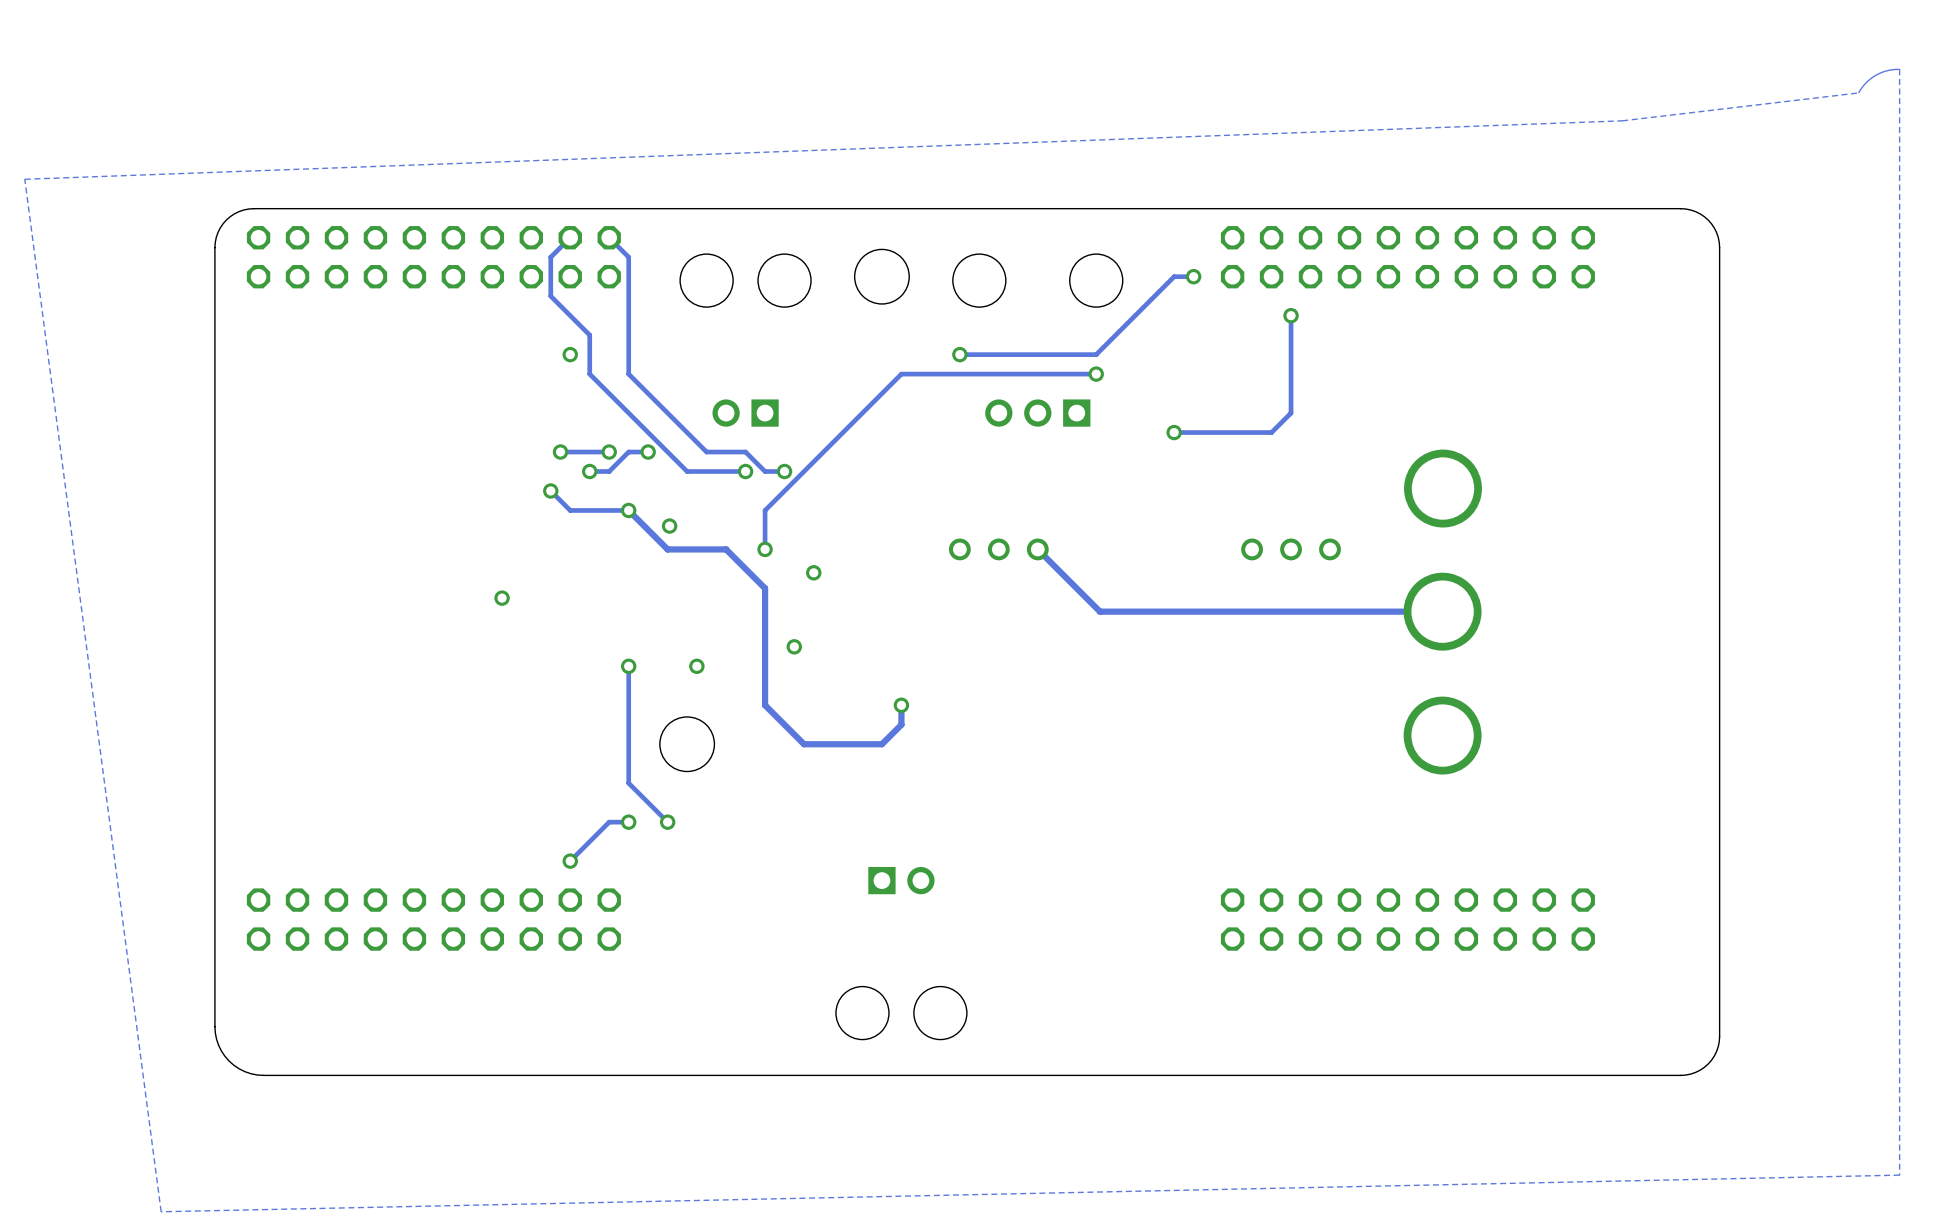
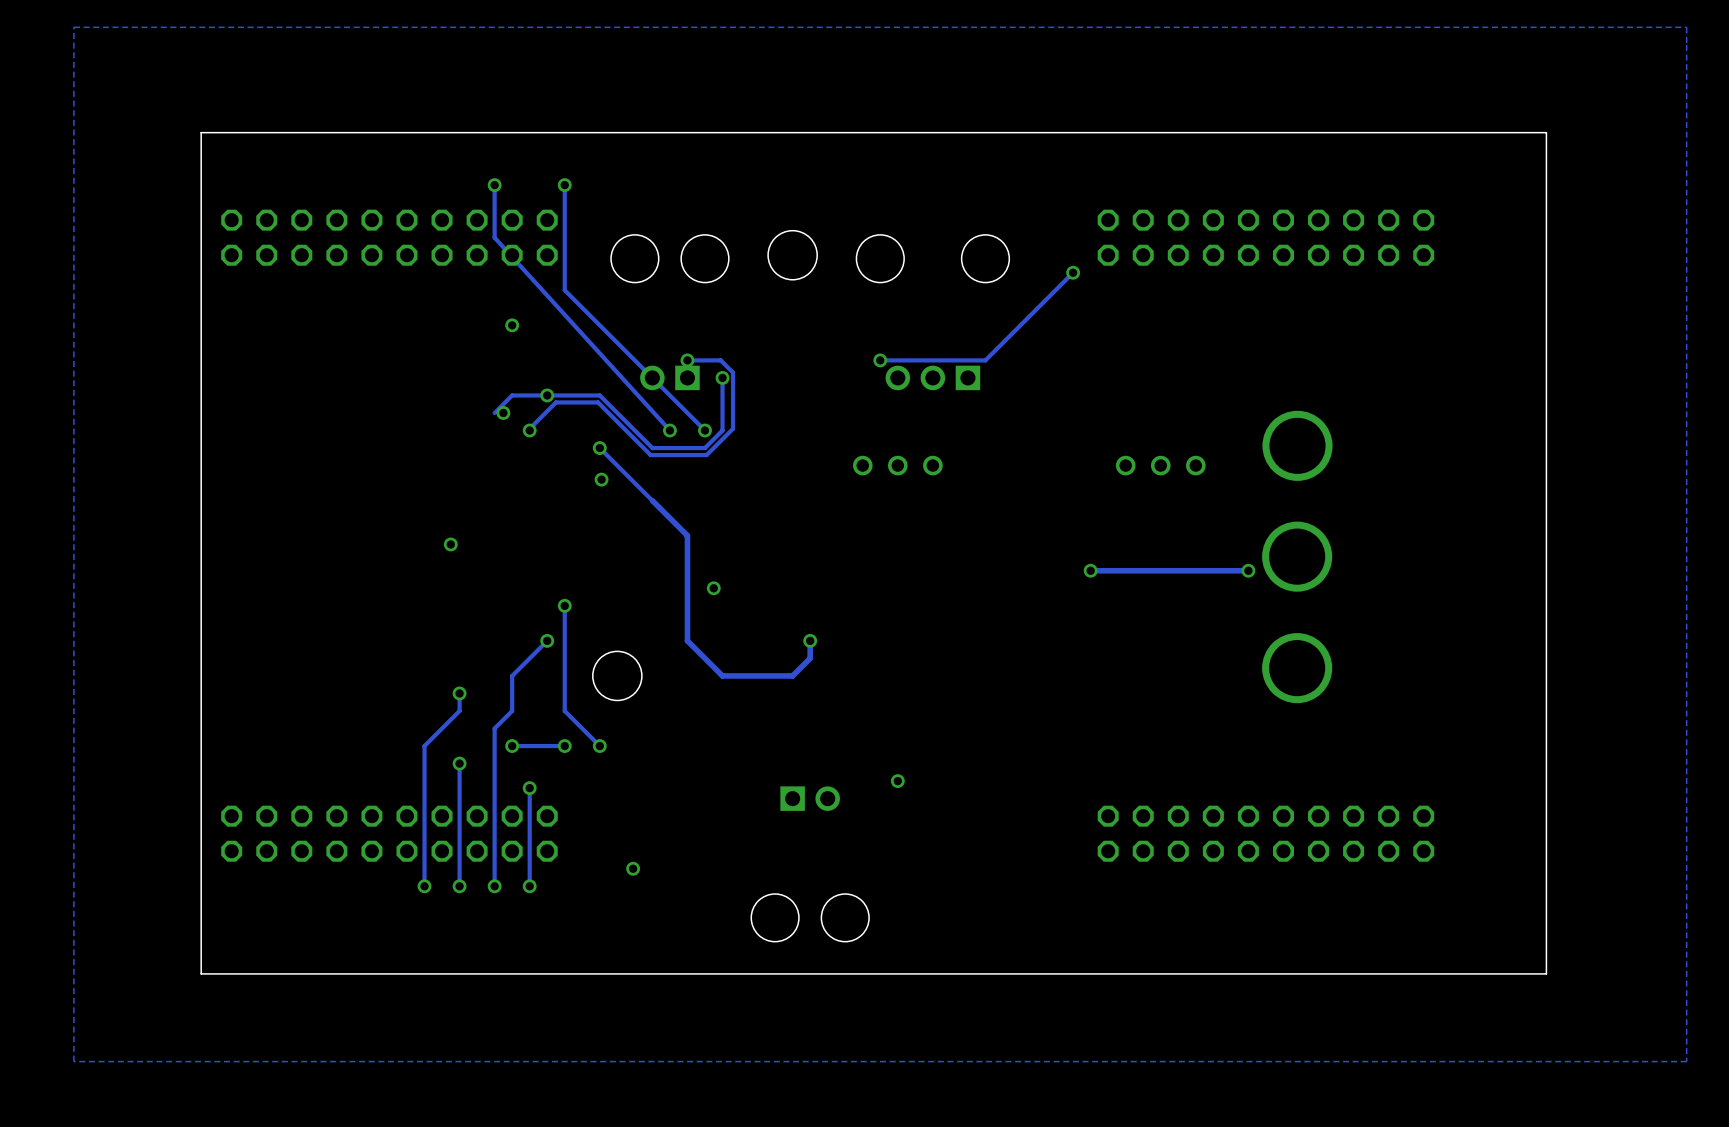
zone outline: (1899, 69) (1884, 71) (1875, 75) (1867, 81) (1858, 92) (1622, 120) (24, 179) (161, 1211) (1899, 1175) (1899, 69) -> (1686, 27) (1686, 1061) (73, 1061) (73, 27) (1686, 27)
via: none -> (494, 185)
via: none -> (564, 185)
track: (570, 237) (550, 257) (550, 296) (589, 335) (589, 374) (687, 471) (745, 471) -> (494, 185) (494, 237) (669, 430)
track: (609, 237) (628, 257) -> (564, 185) (564, 237)
board edge: (1719, 247) (1716, 232) (1708, 220) (1695, 211) (1680, 208) (253, 208) (234, 213) (220, 228) (214, 247) (214, 1026) (218, 1045) (229, 1061) (244, 1071) (263, 1075) -> (1546, 229) (1546, 132) (201, 132) (201, 973) (236, 973)
track: (1193, 276) (1174, 276) (1096, 354) (959, 354) -> none
via position: (1193, 276) -> (1073, 272)
track: none -> (1073, 272) (985, 360) (880, 360)
track: (628, 315) (628, 374) (706, 452) (745, 452) (765, 471) (784, 471) -> (564, 290) (704, 430)
track: (1291, 315) (1291, 413) (1271, 432) (1174, 432) -> none
via: (1291, 315) -> none
via position: (959, 354) -> (880, 360)
track: (1096, 374) (901, 374) (804, 471) -> (722, 377) (722, 430)
via: (1096, 374) -> none
via: none -> (687, 360)
via: none -> (722, 377)
via: (1174, 432) -> none
track: (609, 452) (560, 452) -> none
via position: (609, 452) -> (547, 395)
track: (648, 452) (628, 452) (609, 471) (589, 471) -> (687, 360) (720, 360) (733, 372) (733, 428) (706, 455) (650, 455) (598, 402) (555, 402) (529, 430)
via: (648, 452) -> none
track: (550, 490) (570, 510) (628, 510) (667, 549) (726, 549) -> (599, 448) (652, 500)
via: (550, 490) -> none
via: none -> (599, 448)
track: (784, 490) (765, 510) (765, 549) -> (704, 448) (652, 448) (599, 395) (512, 395) (494, 412)
via: (628, 510) -> none
via: (765, 549) -> none
part position: (998, 549) -> (897, 465)
track: (1037, 549) (1100, 611) (1442, 611) -> none
part position: (1291, 549) -> (1160, 465)
via: (813, 572) -> none
via: none -> (1090, 570)
track: none -> (1248, 570) (1090, 570)
via: none -> (1248, 570)
via: (696, 666) -> none
track: none -> (547, 640) (512, 675) (512, 710) (494, 728) (494, 886)
via: none -> (547, 640)
track: none -> (459, 693) (459, 710) (424, 746) (424, 886)
via: none -> (459, 693)
via: none -> (512, 746)
track: (609, 822) (570, 861) -> (547, 746) (512, 746)
track: none -> (459, 763) (459, 886)
via: none -> (459, 763)
via: (570, 861) -> none
via: none -> (897, 781)
track: none -> (529, 788) (529, 886)
via: none -> (529, 788)
via: none -> (633, 868)
via: none -> (424, 886)
via: none -> (459, 886)
via: none -> (494, 886)
via: none -> (529, 886)
board edge: (1719, 1036) (1716, 1051) (1708, 1063) (1695, 1072) (1680, 1075) -> (1546, 938) (1546, 973) (1511, 973)

